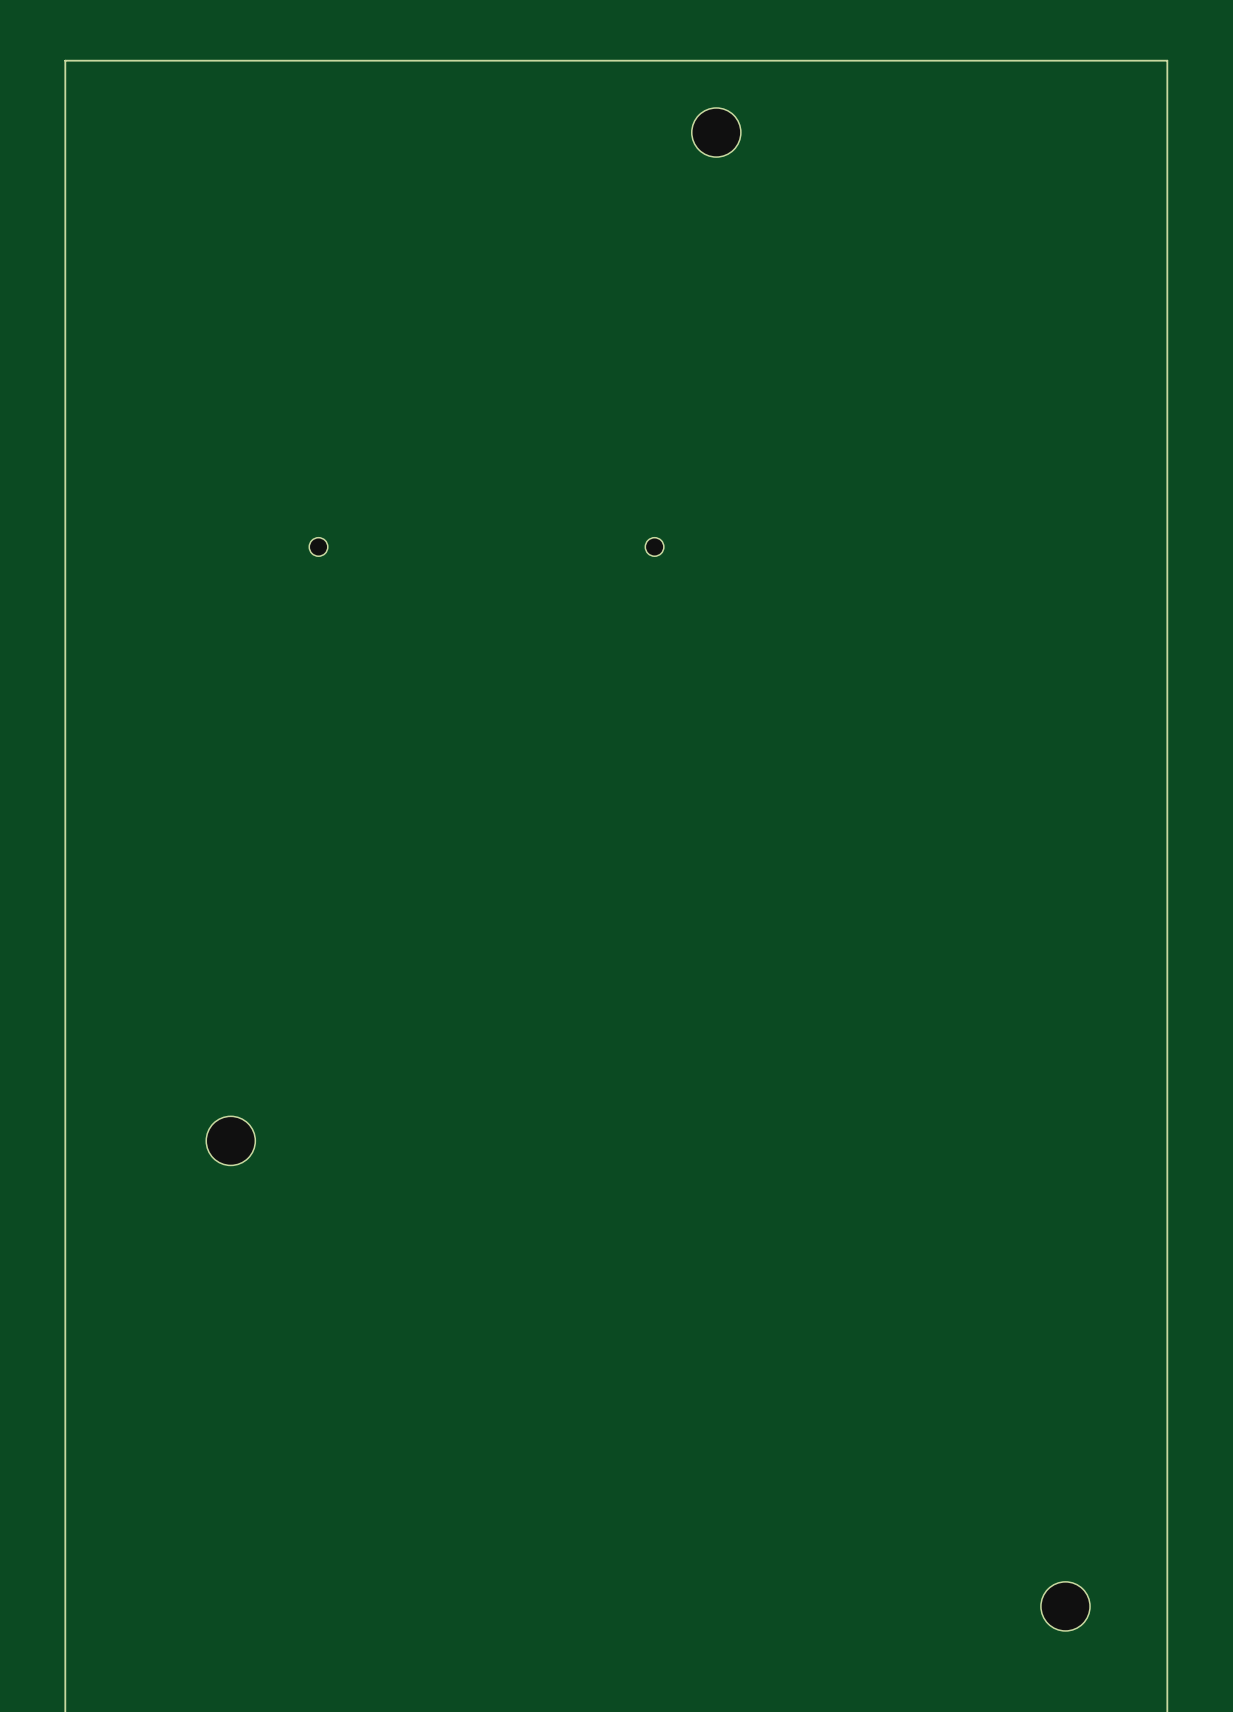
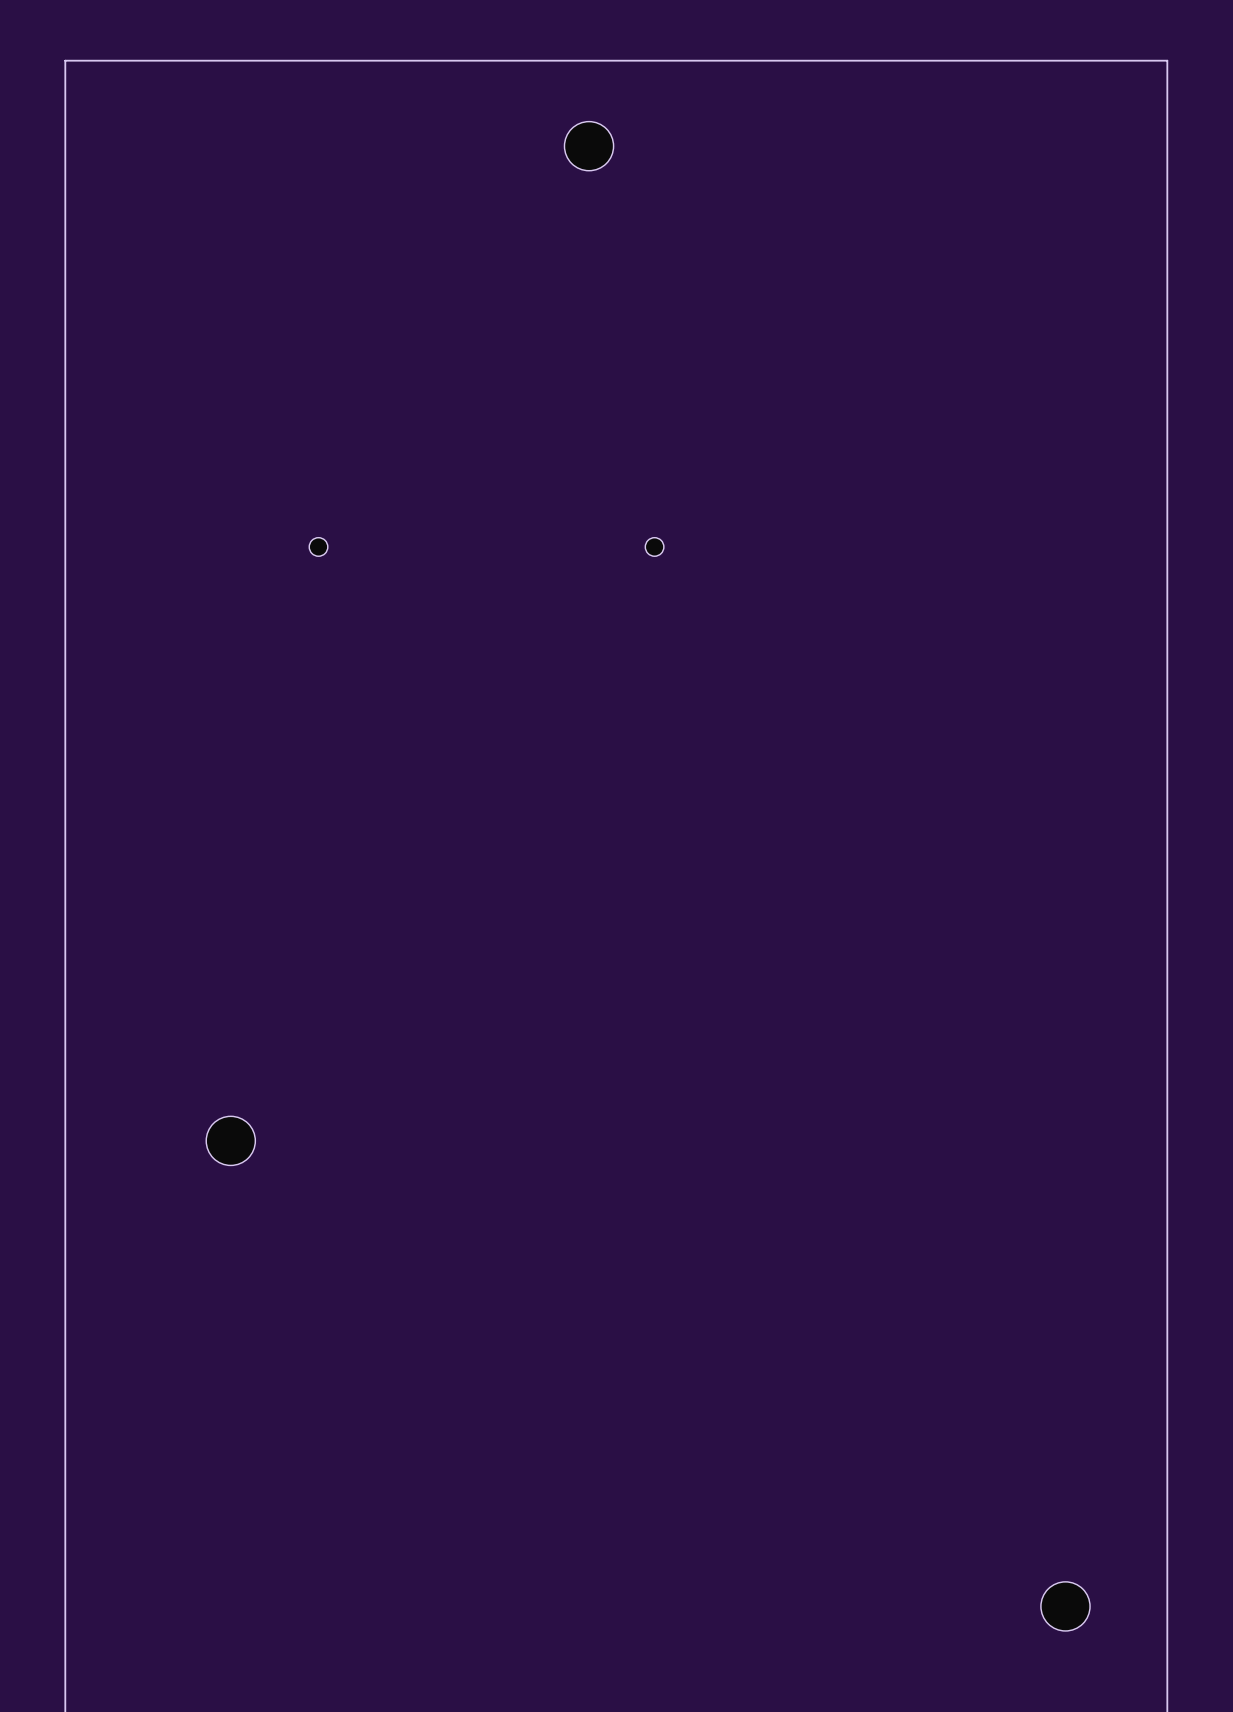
part position: (716, 132) -> (589, 146)

